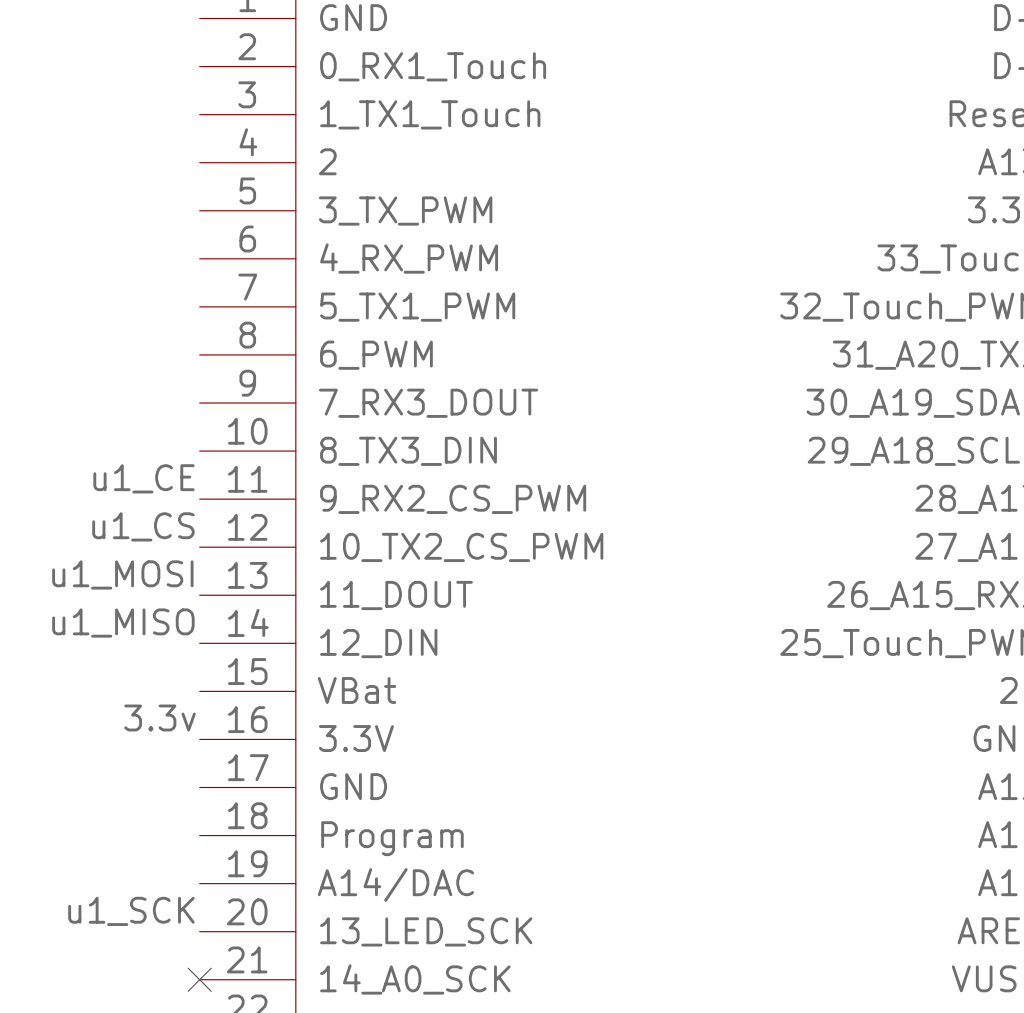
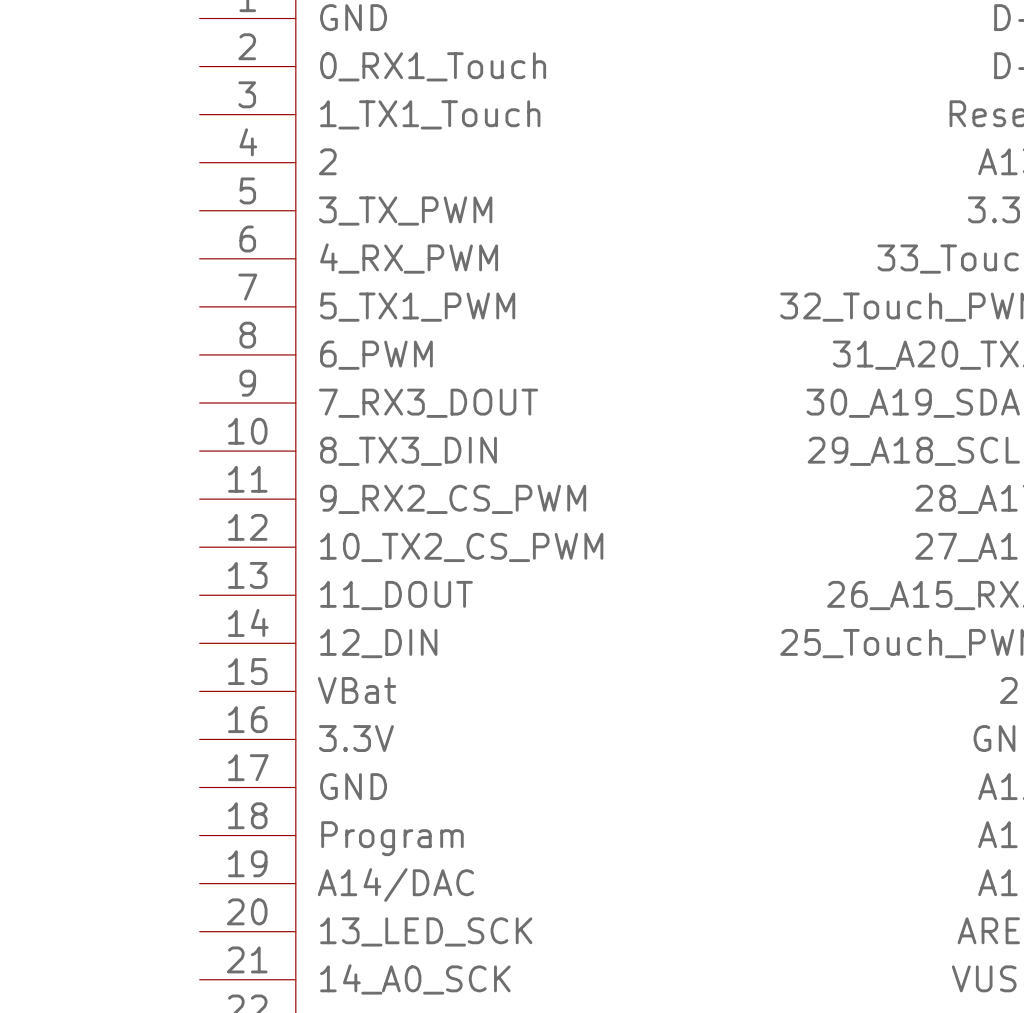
label: u1_CE (144, 478) -> none
label: u1_CS (143, 526) -> none
label: u1_MOSI (122, 574) -> none
label: u1_MISO (123, 623) -> none
label: 3.3v (160, 717) -> none
label: u1_SCK (131, 911) -> none
no-connect mark: (199, 979) -> none

